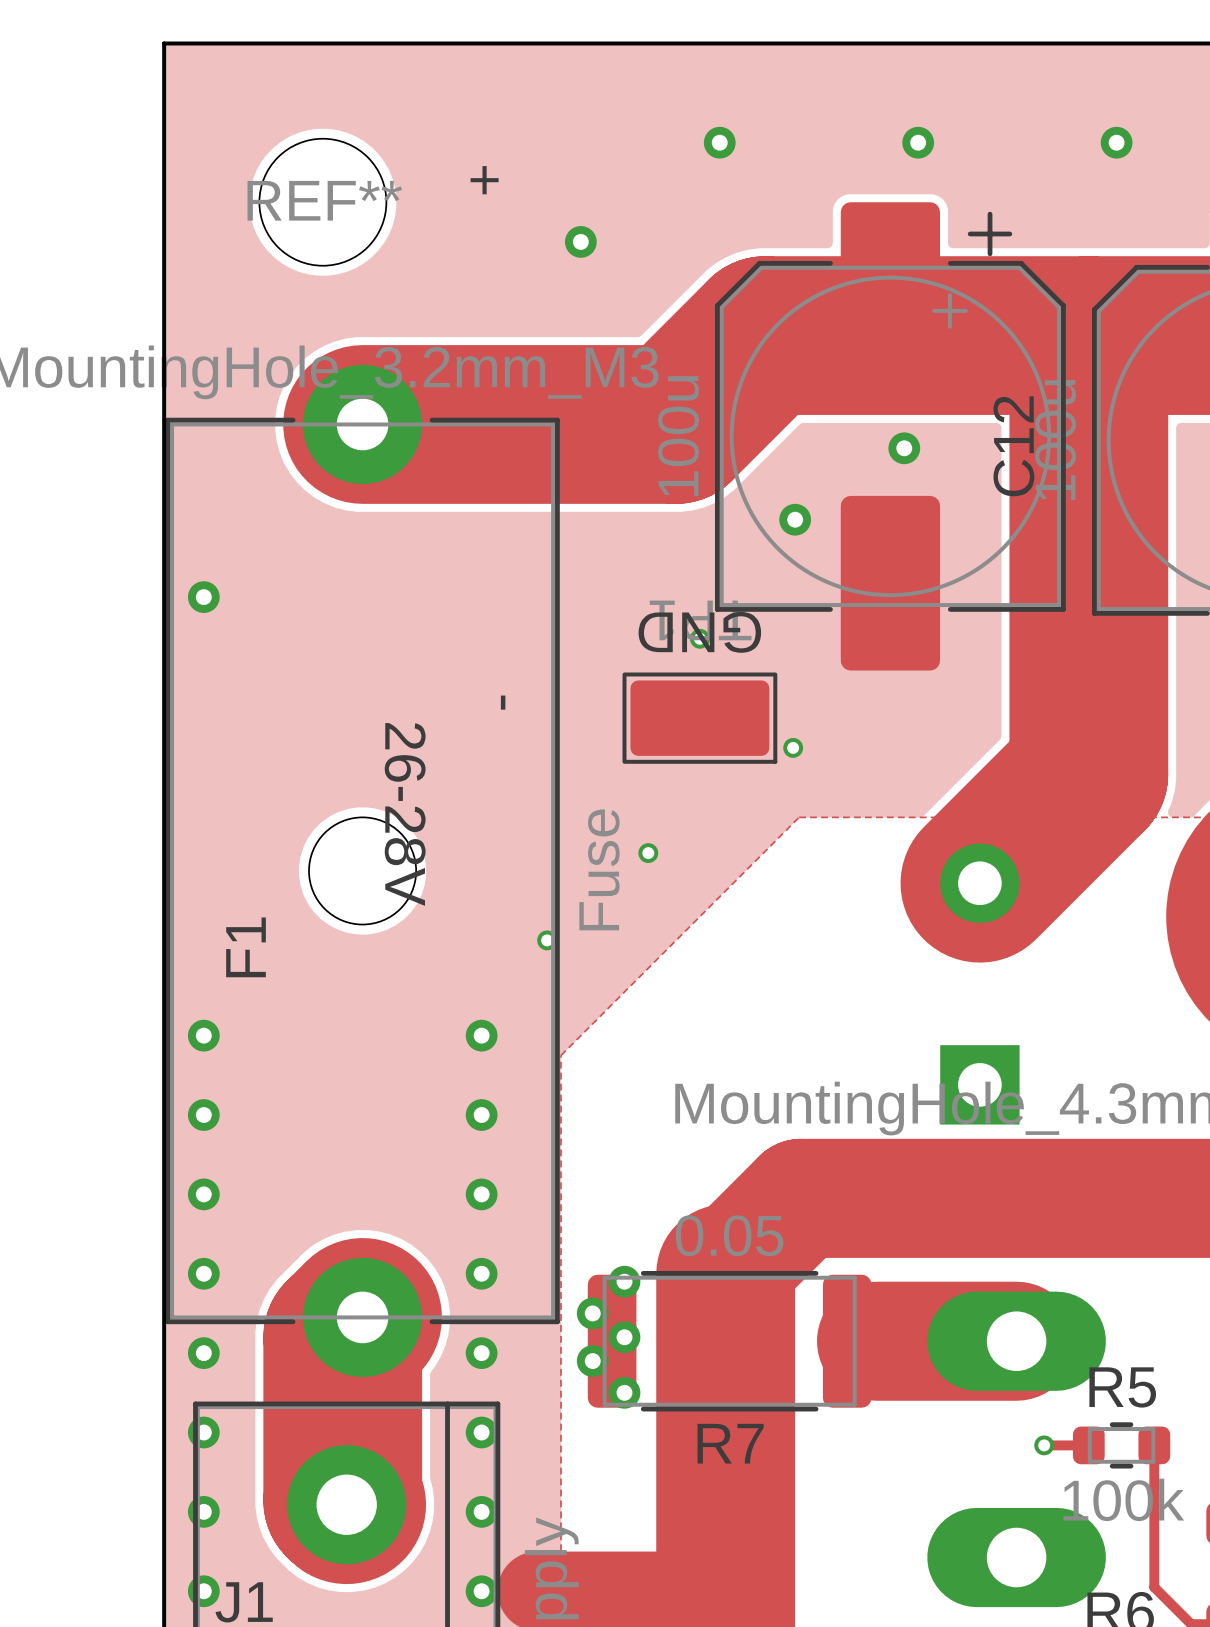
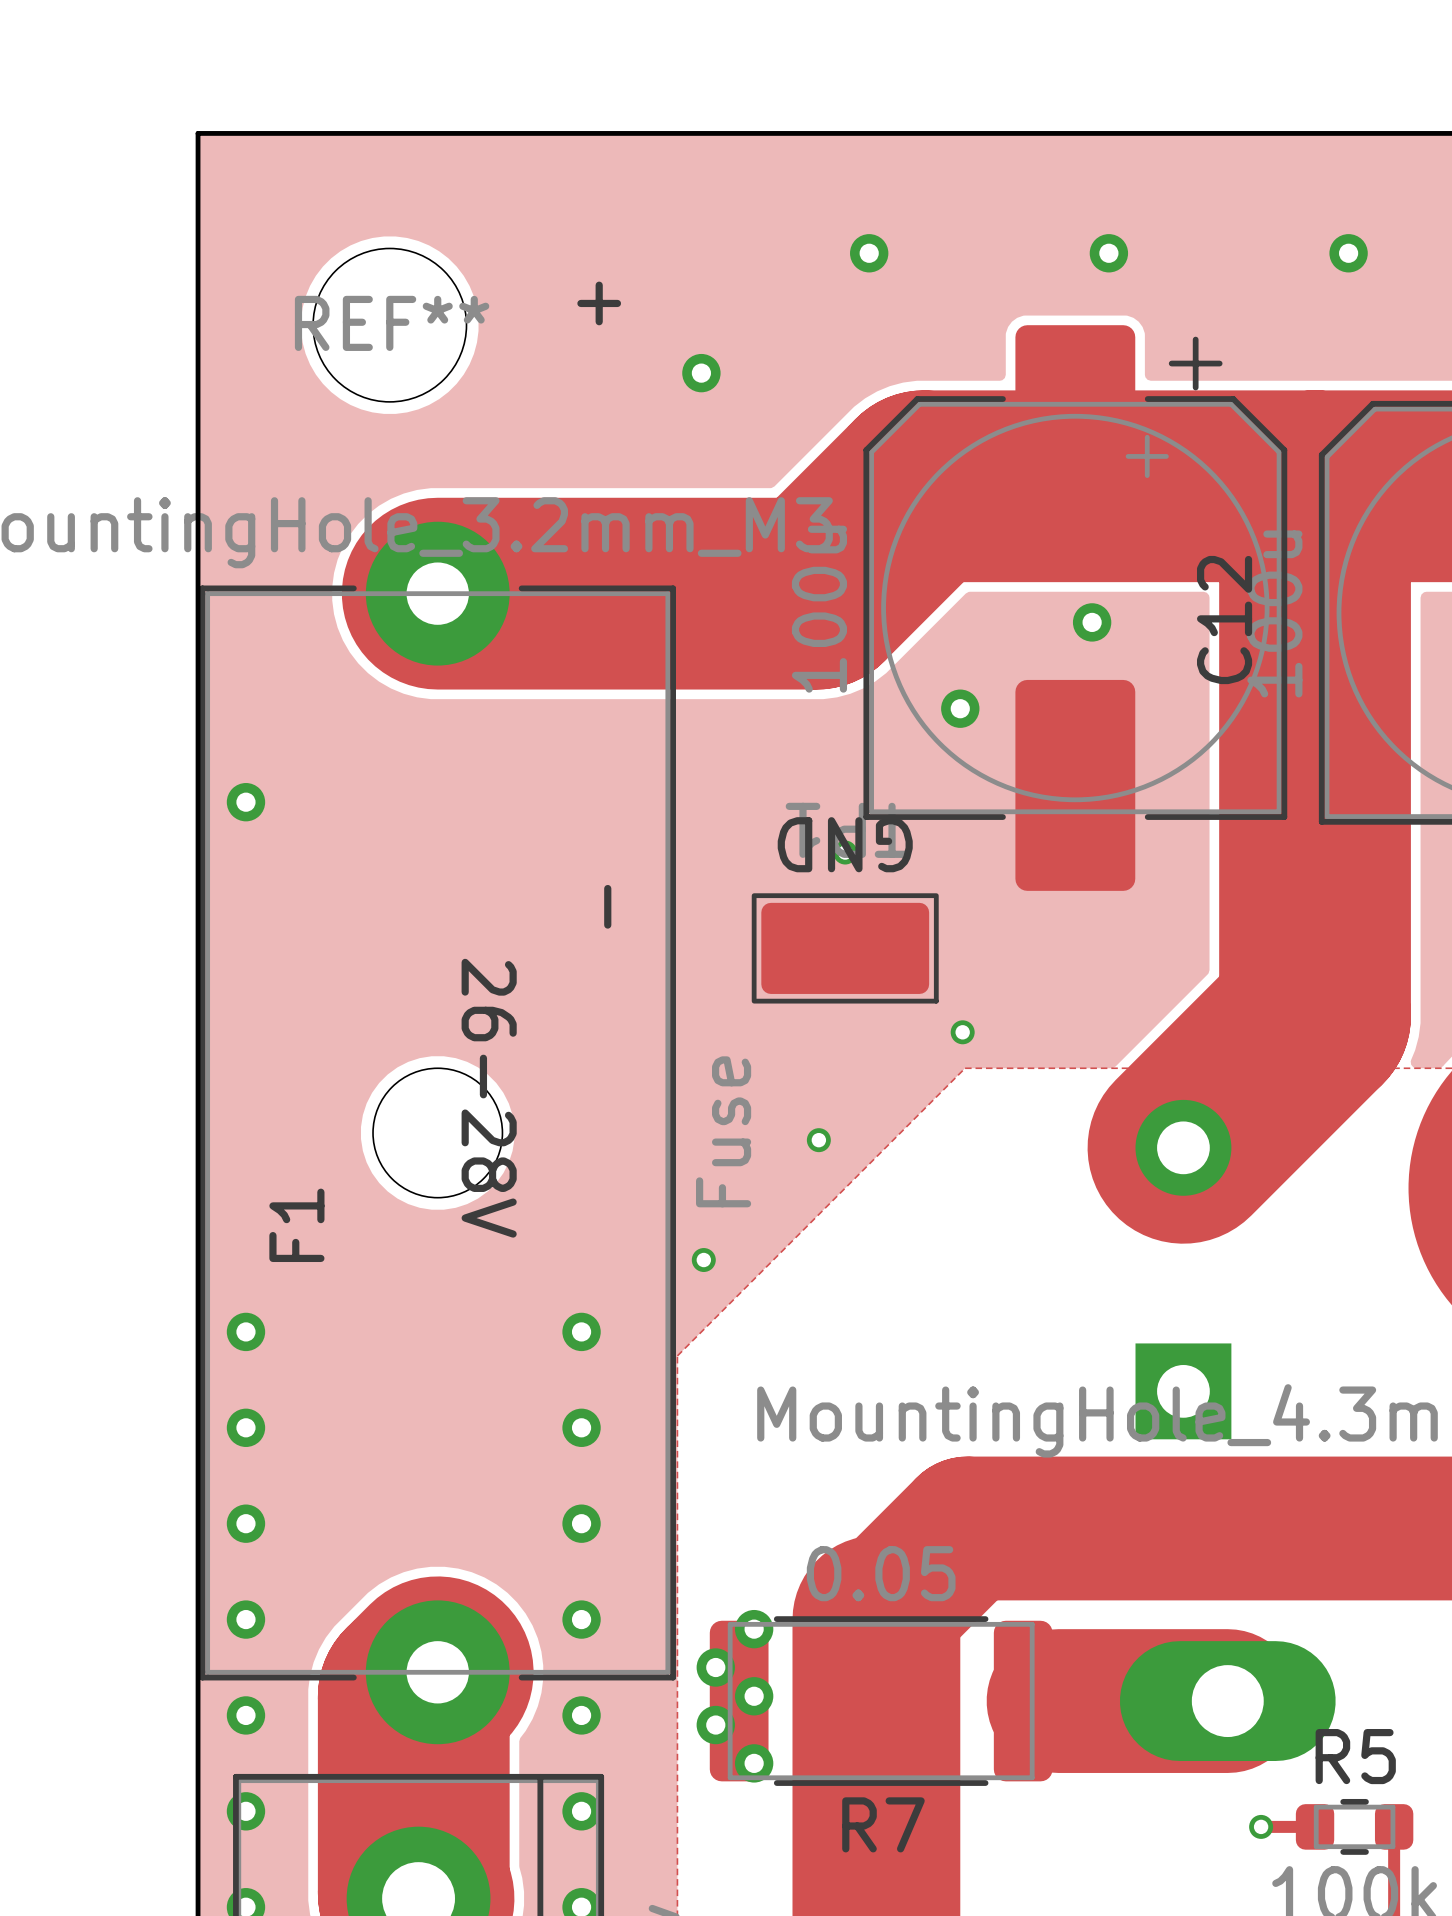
via position: (793, 747) -> (962, 1032)
via position: (648, 853) -> (818, 1140)
via position: (547, 940) -> (703, 1260)

